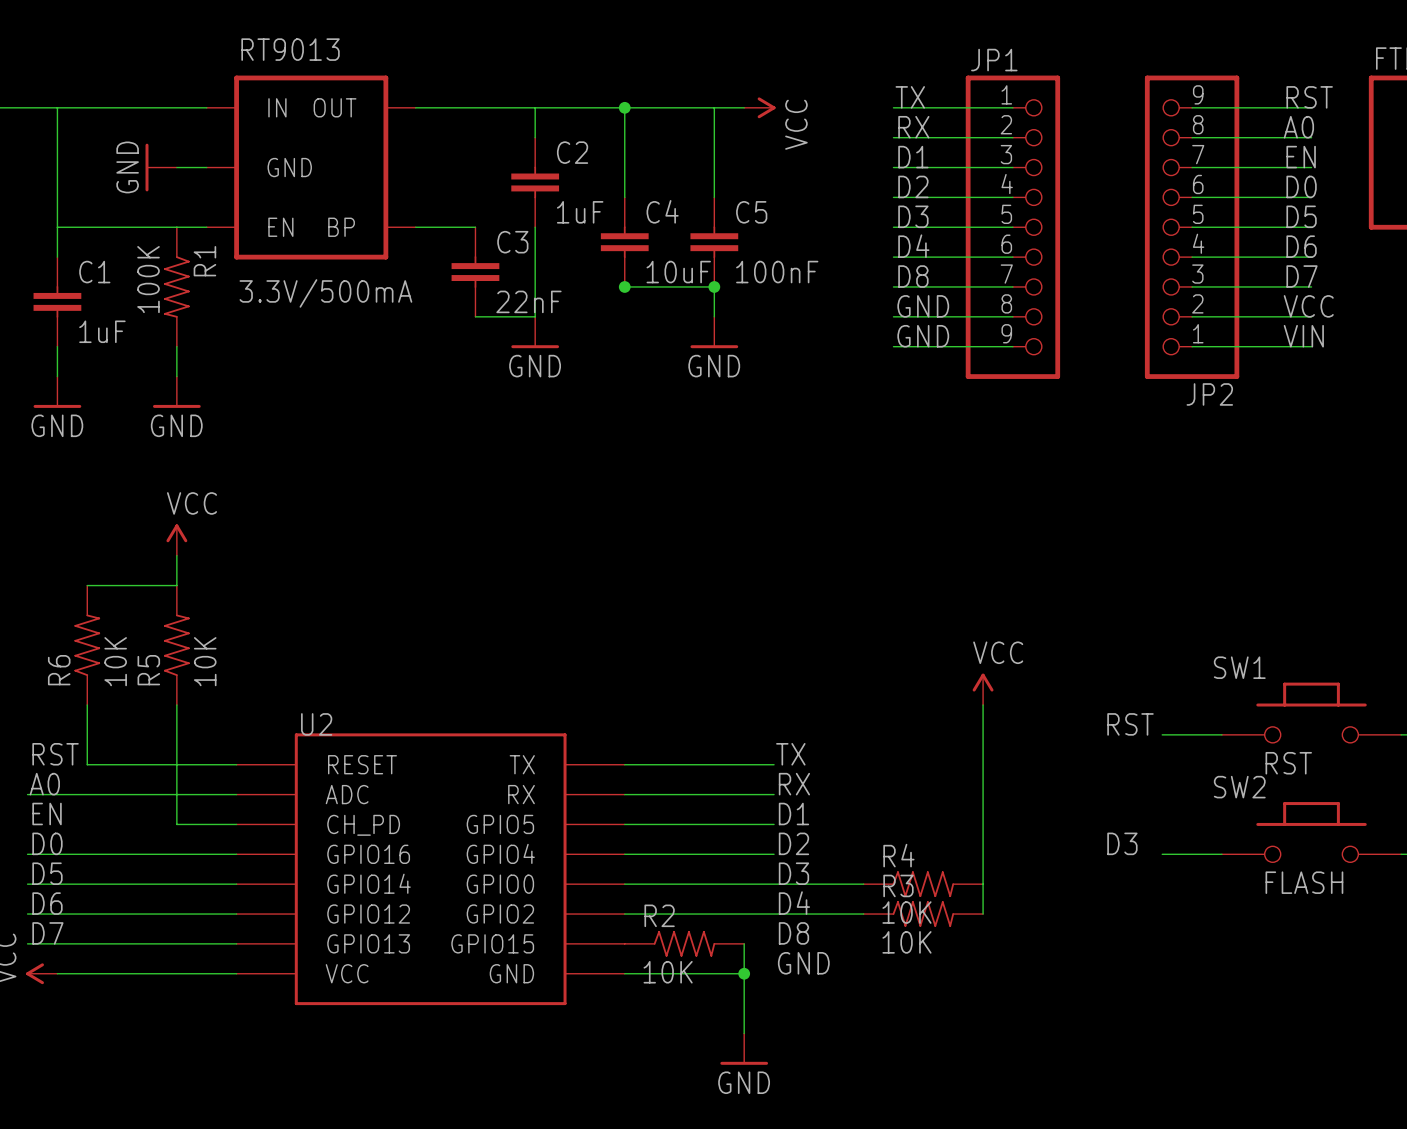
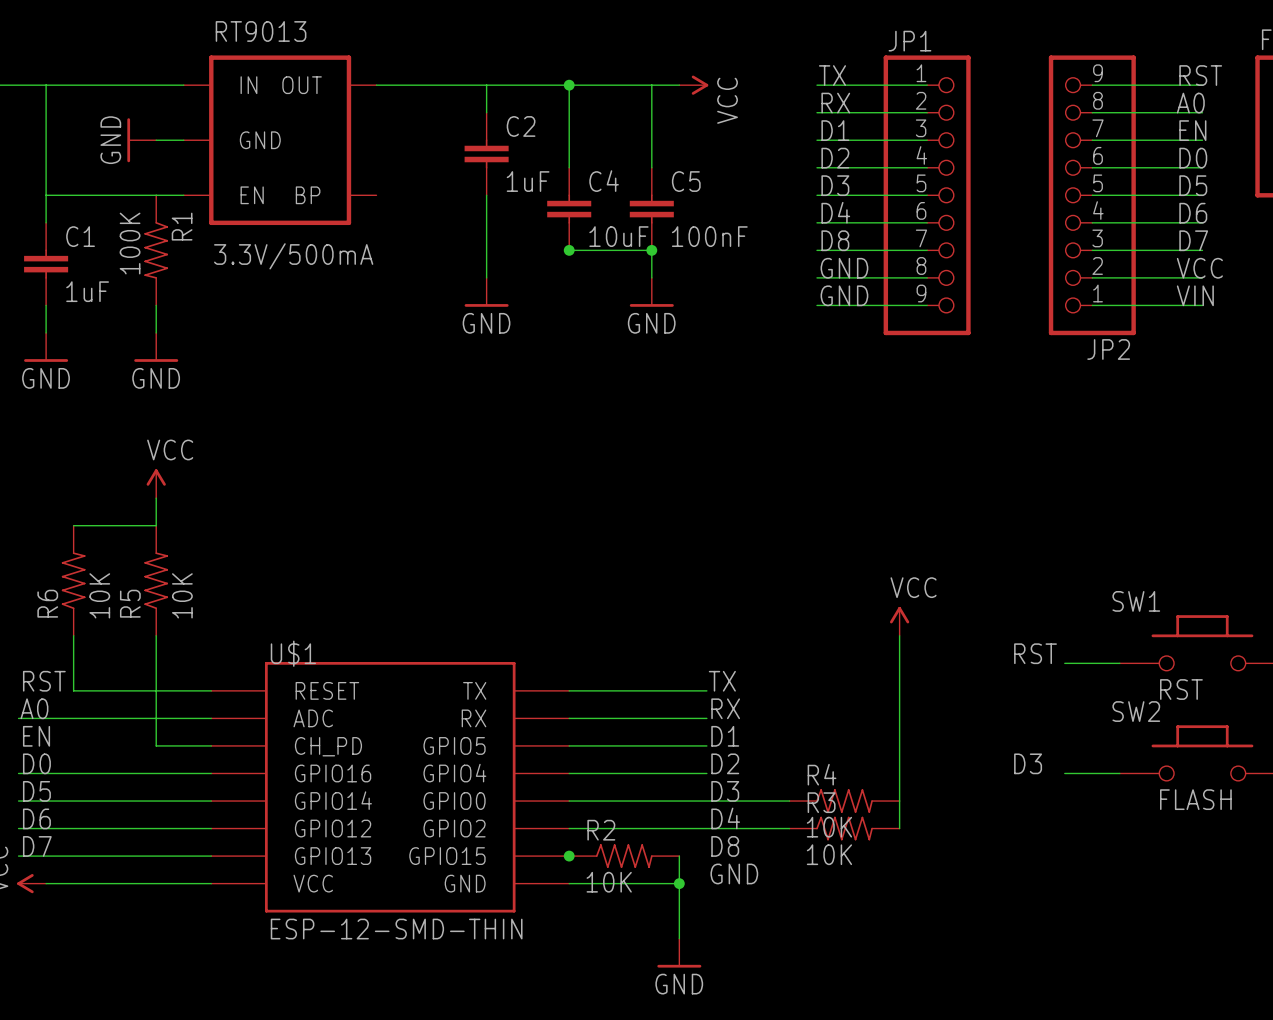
wire: (415, 227) (475, 227) -> none
C3: 22nF (475, 272) -> none
wire: (475, 316) (535, 316) -> none
U2 name: U2 (316, 724) -> U$1 (293, 653)
junction: none -> (569, 856)
U2 value: none -> ESP-12-SMD-THIN (396, 929)

